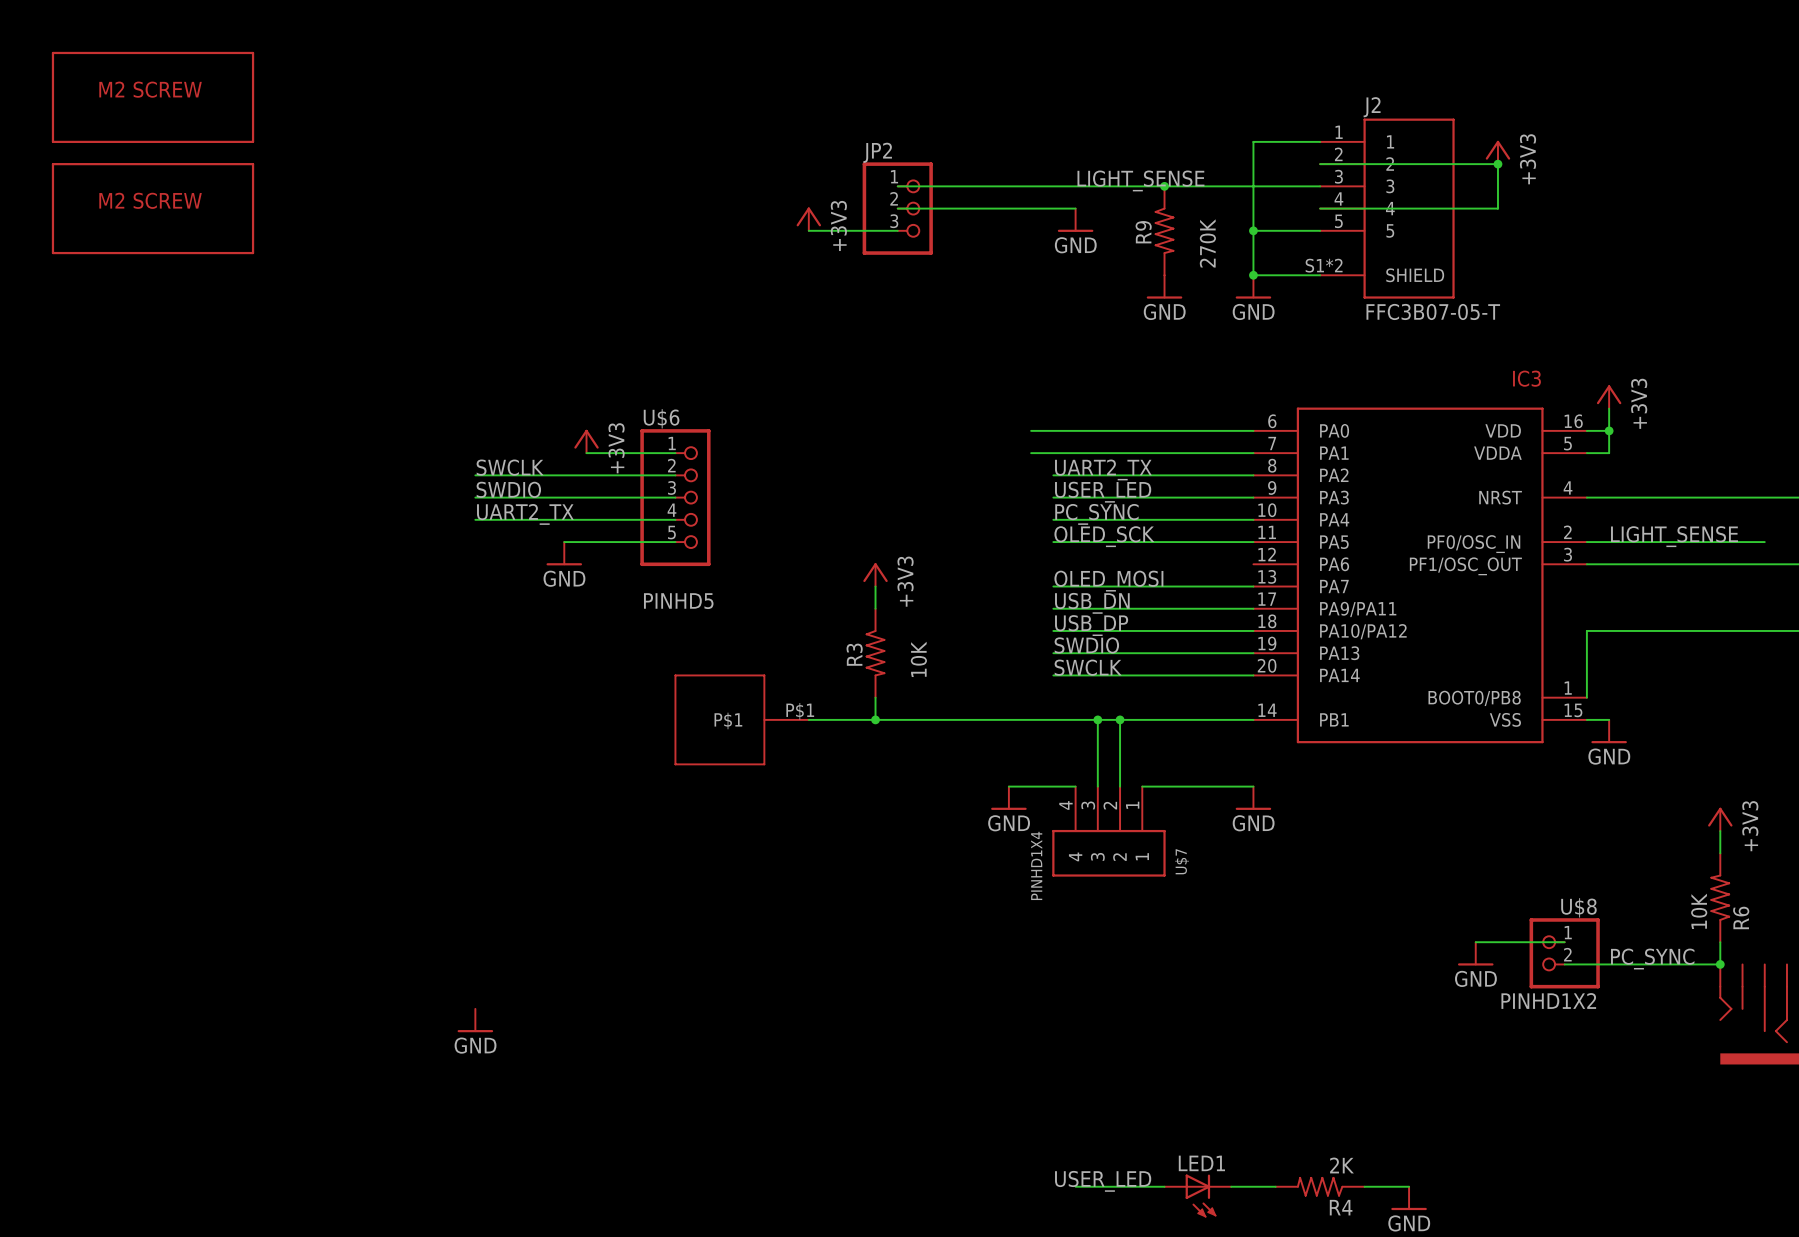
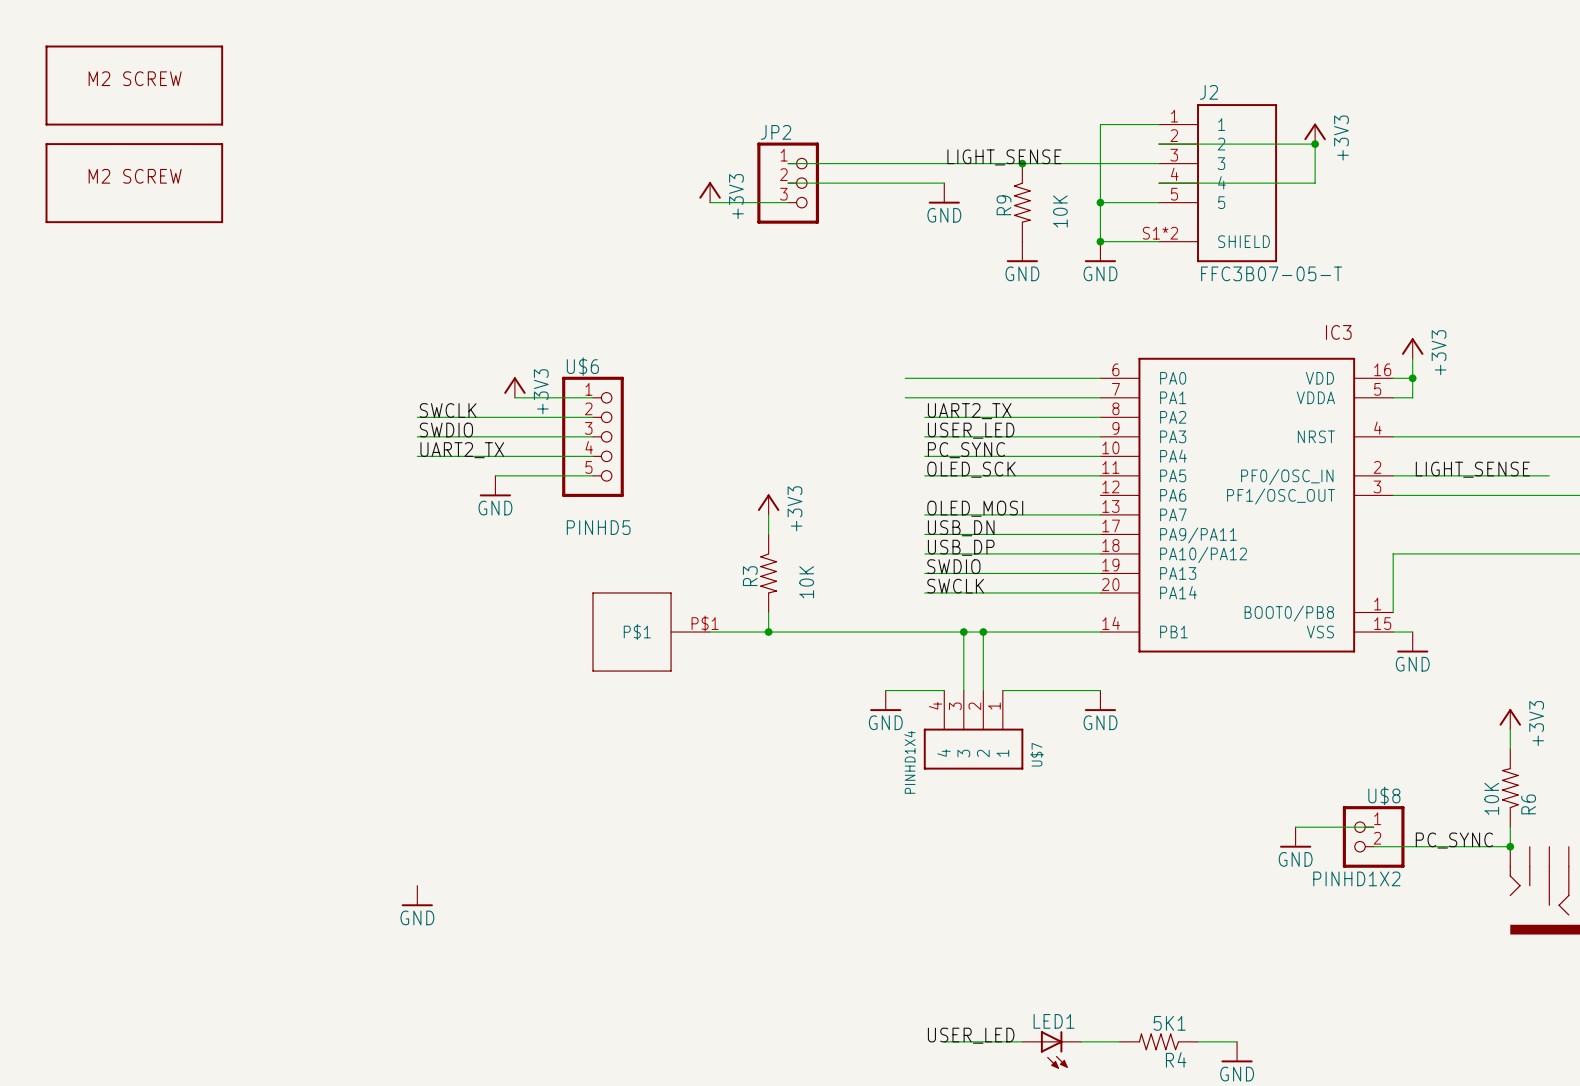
R9 value: 270K (1207, 243) -> 10K (1060, 211)
R4 value: 2K (1341, 1165) -> 5K1 (1169, 1023)

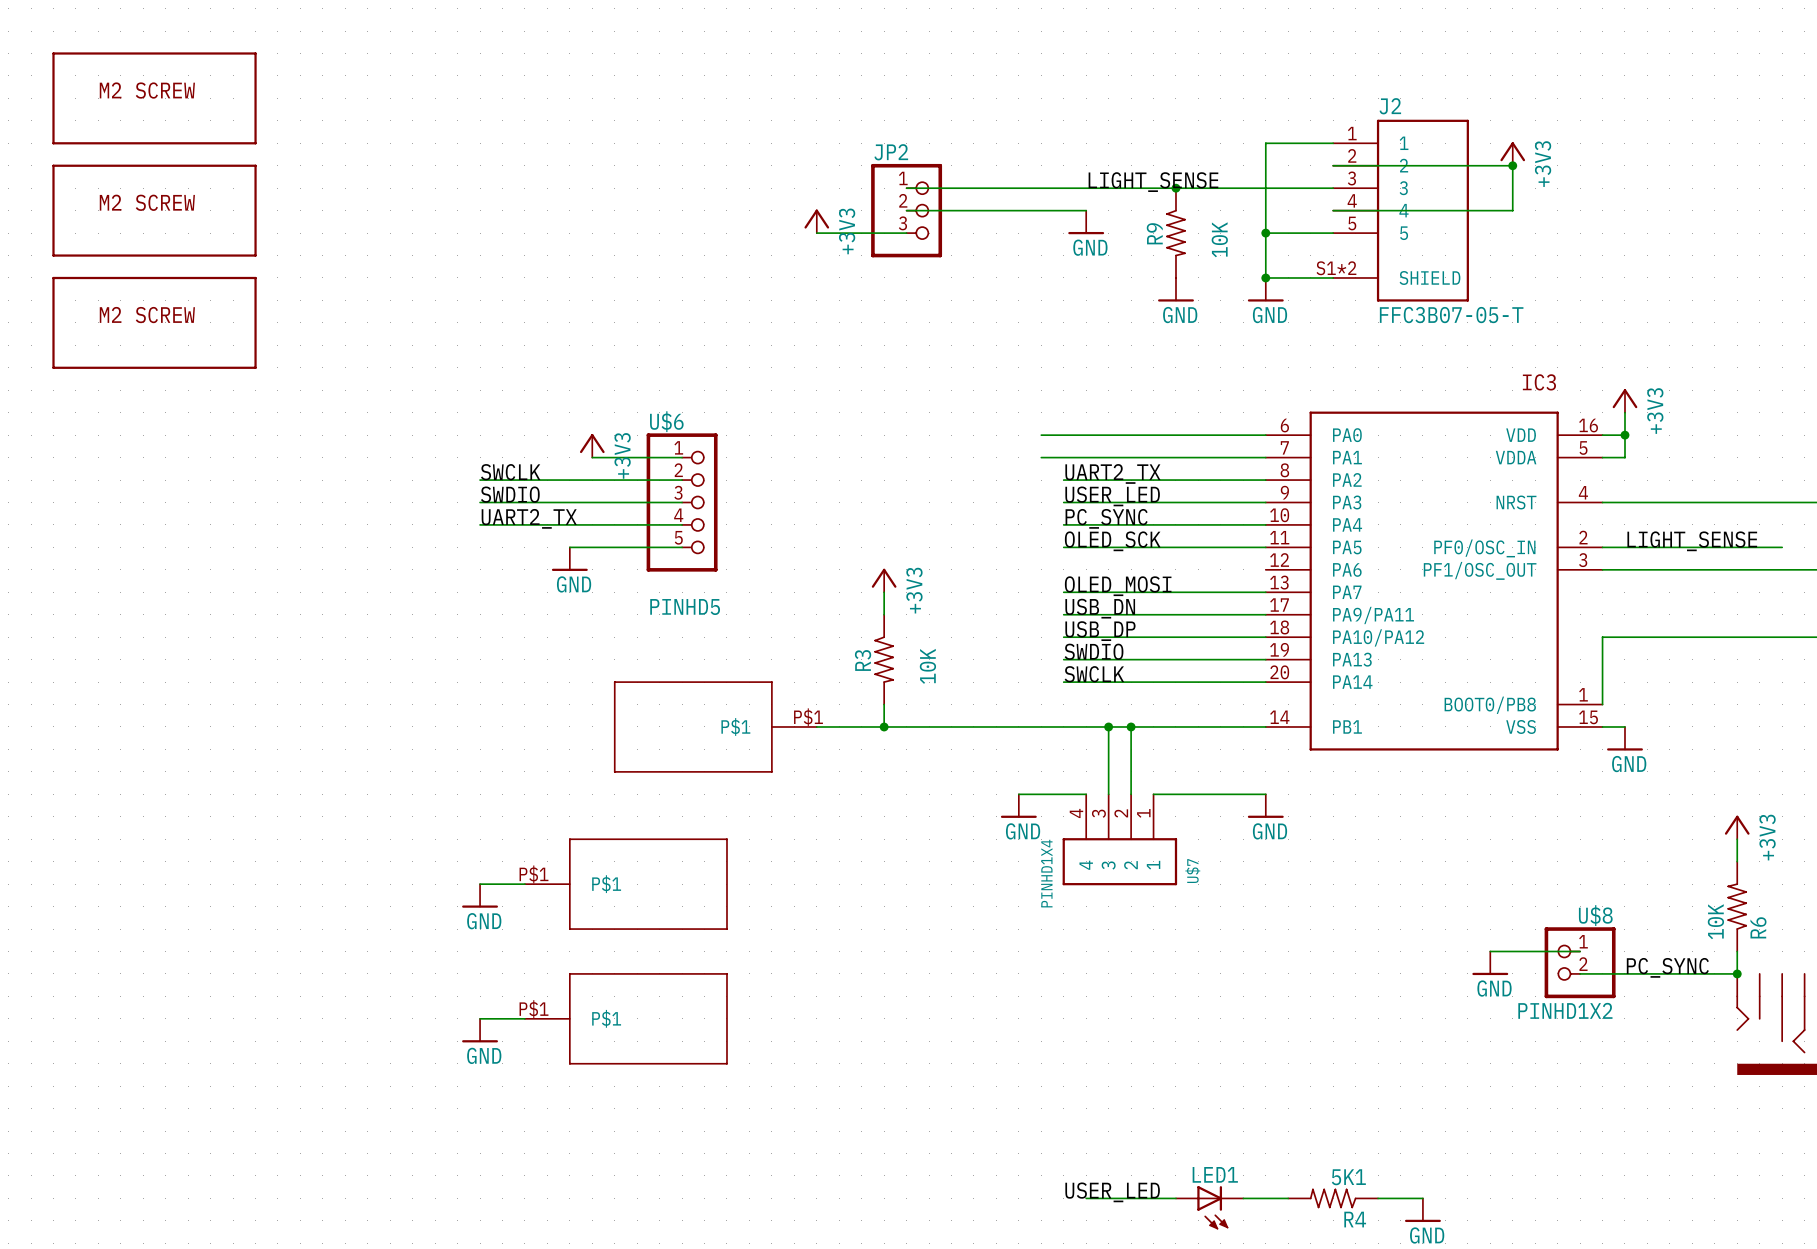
part: none -> (154, 322)
part: none -> (715, 726)
part: (651, 632) -> none
wire: none -> (480, 884) (524, 884)
part: none -> (626, 884)
power symbol: none -> GND (480, 895)
wire: none -> (480, 1018) (524, 1018)
part: none -> (626, 1018)

